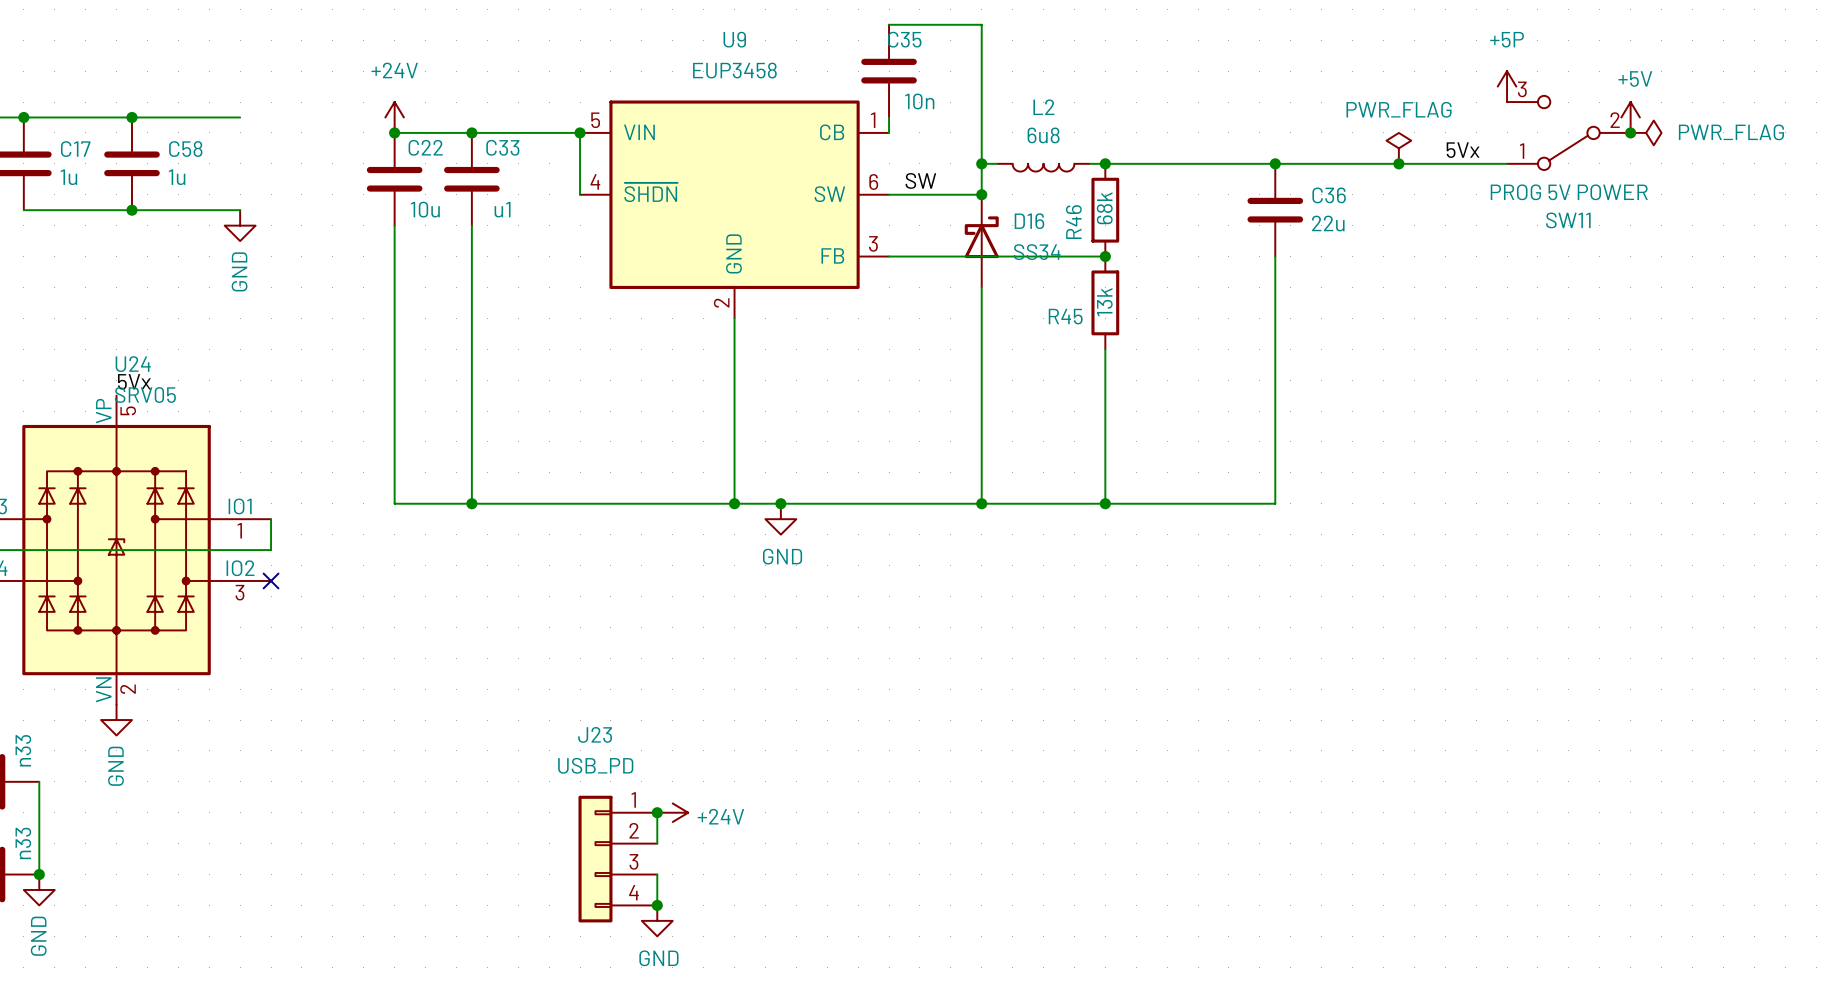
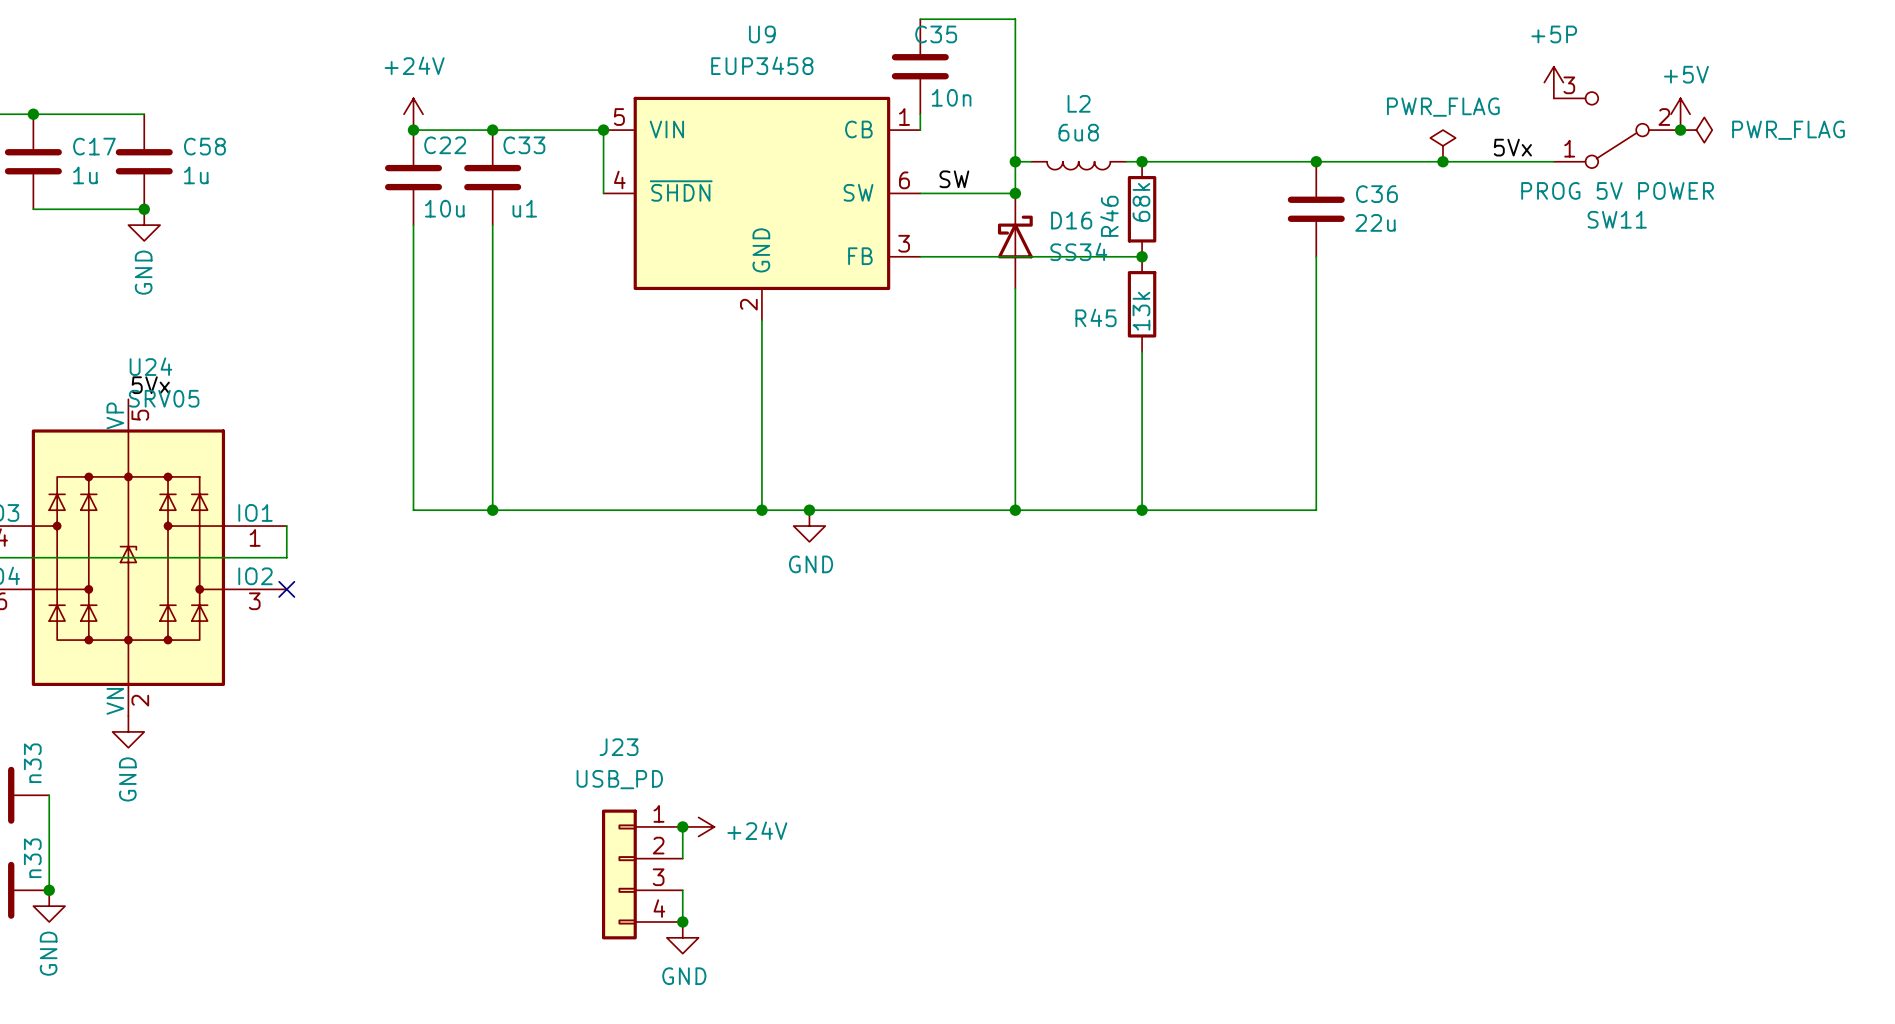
wire: (131, 117) (240, 117) -> none
junction: (131, 117) -> none
wire: (131, 210) (240, 210) -> none
power symbol position: GND (240, 225) -> GND (144, 225)

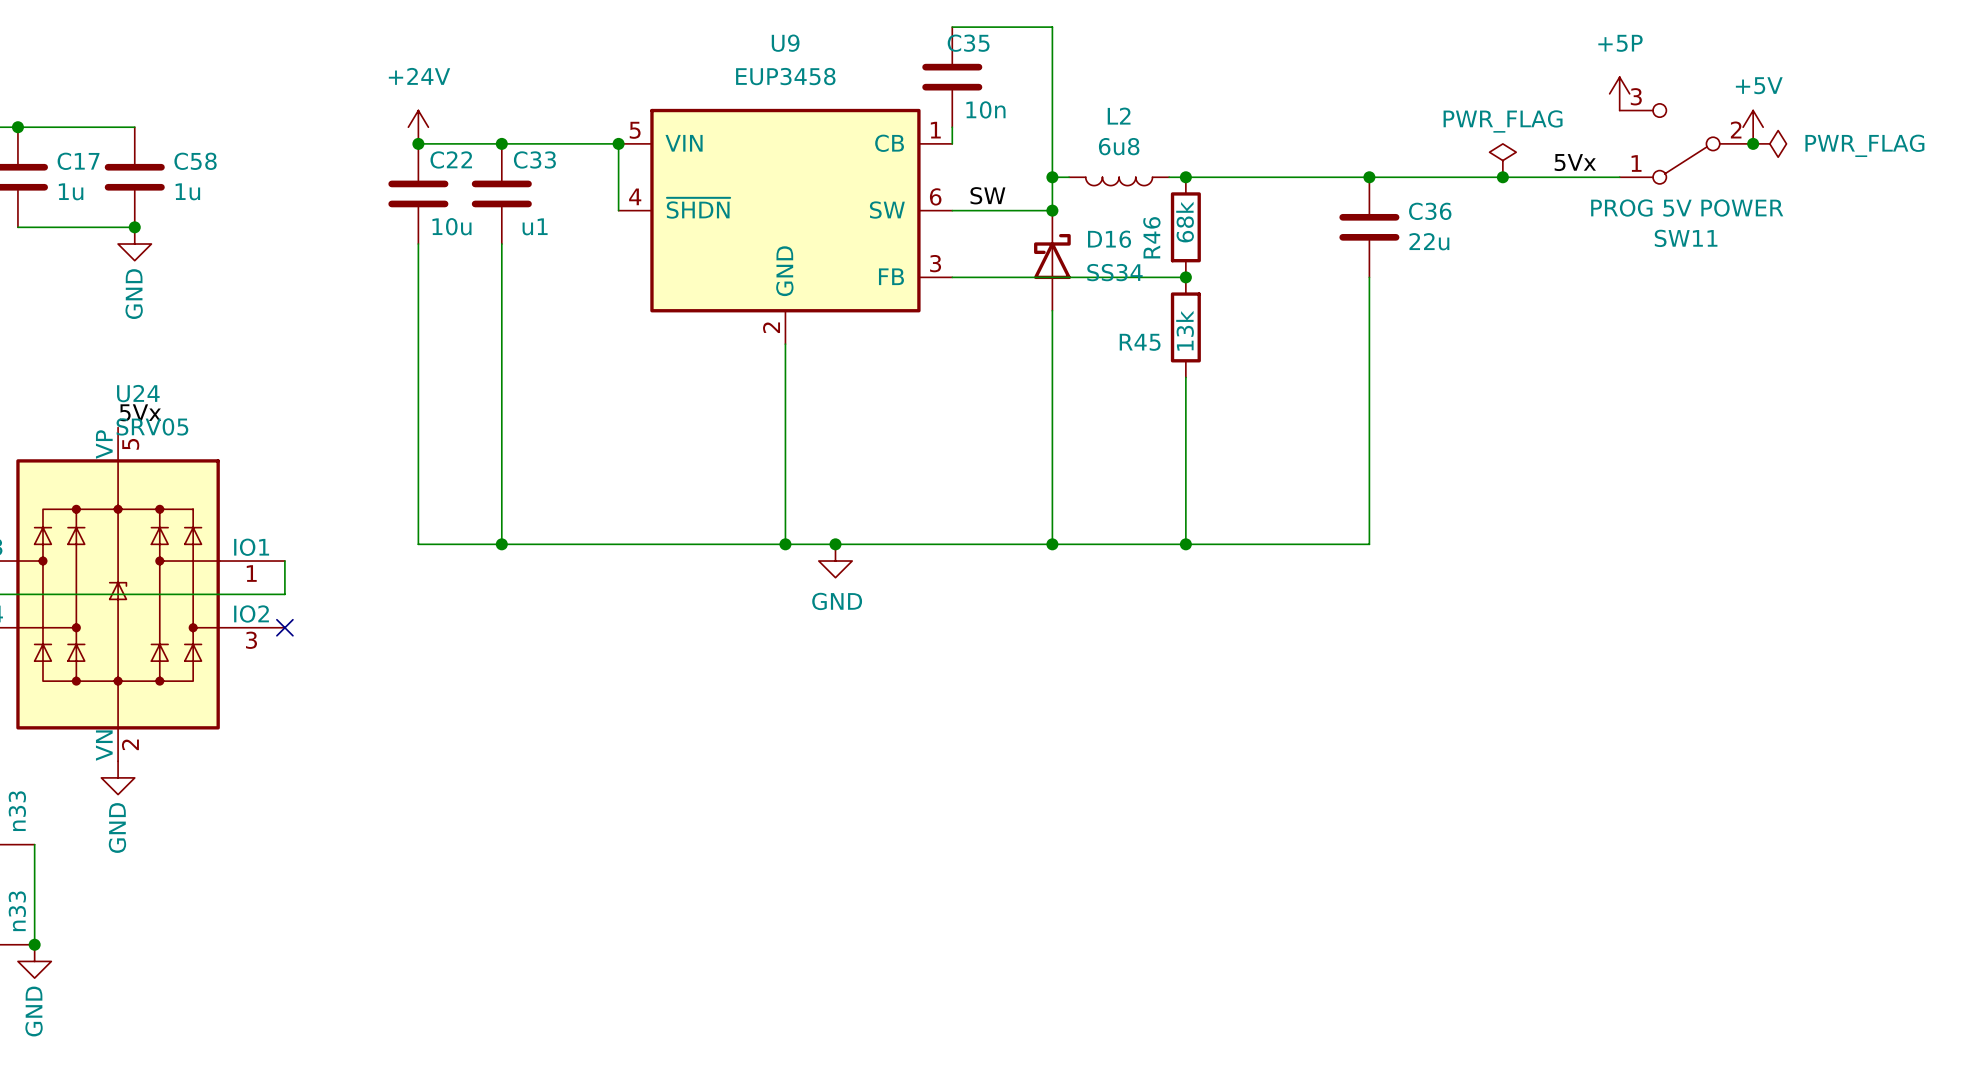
wire: (682, 826) (682, 858) -> none
junction: (682, 826) -> none
power symbol: +24V (698, 826) -> none
J23: USB_PD (642, 874) -> none
wire: (682, 890) (682, 921) -> none
junction: (682, 921) -> none
power symbol: GND (682, 937) -> none

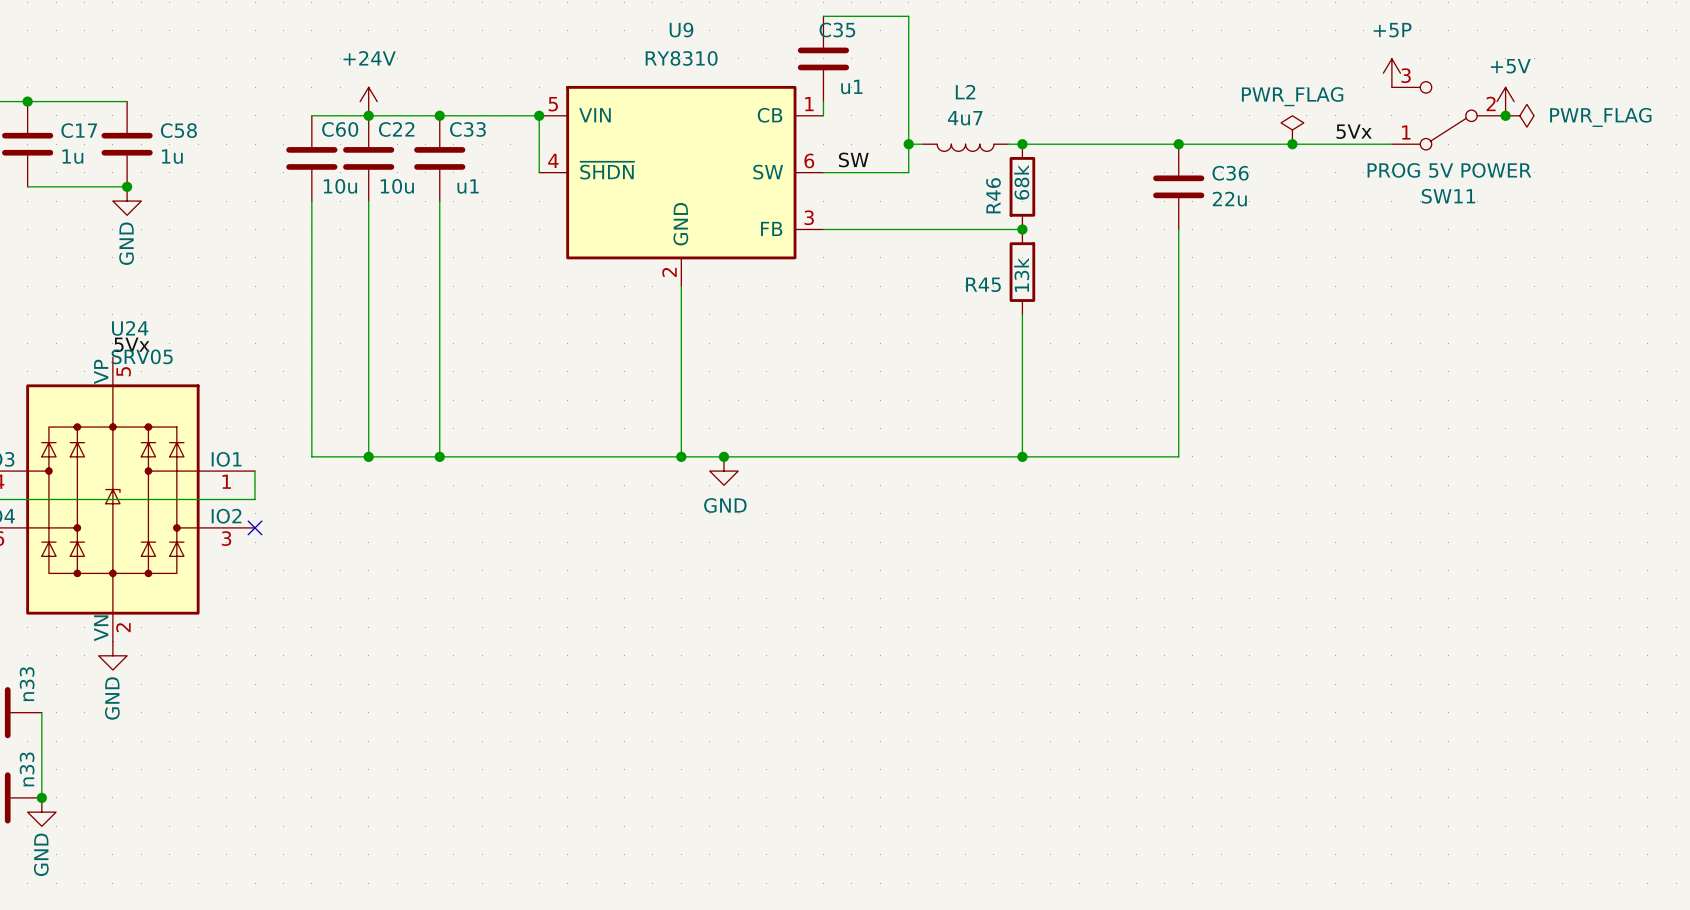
U9 value: EUP3458 (785, 76) -> RY8310 (681, 58)
C35 value: 10n (985, 109) -> u1 (851, 86)
wire: none -> (311, 115) (368, 115)
L2 value: 6u8 (1119, 146) -> 4u7 (965, 118)
C60: none -> 10u (311, 158)
junction: (1052, 210) -> none
wire: none -> (311, 201) (311, 456) (368, 456)
D16: SS34 (1052, 260) -> none
wire: (1052, 310) (1052, 544) -> none
junction: none -> (368, 456)
junction: (1052, 544) -> none

